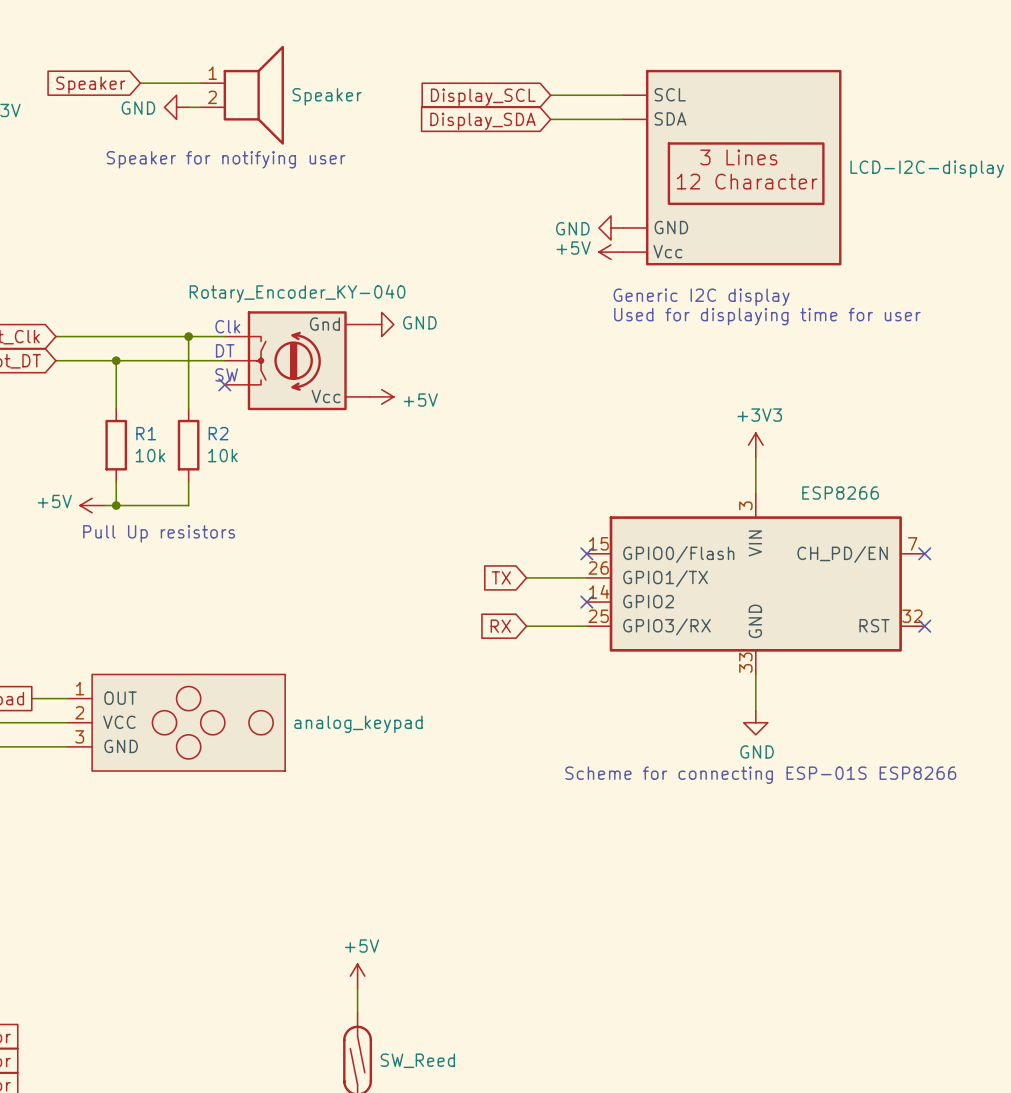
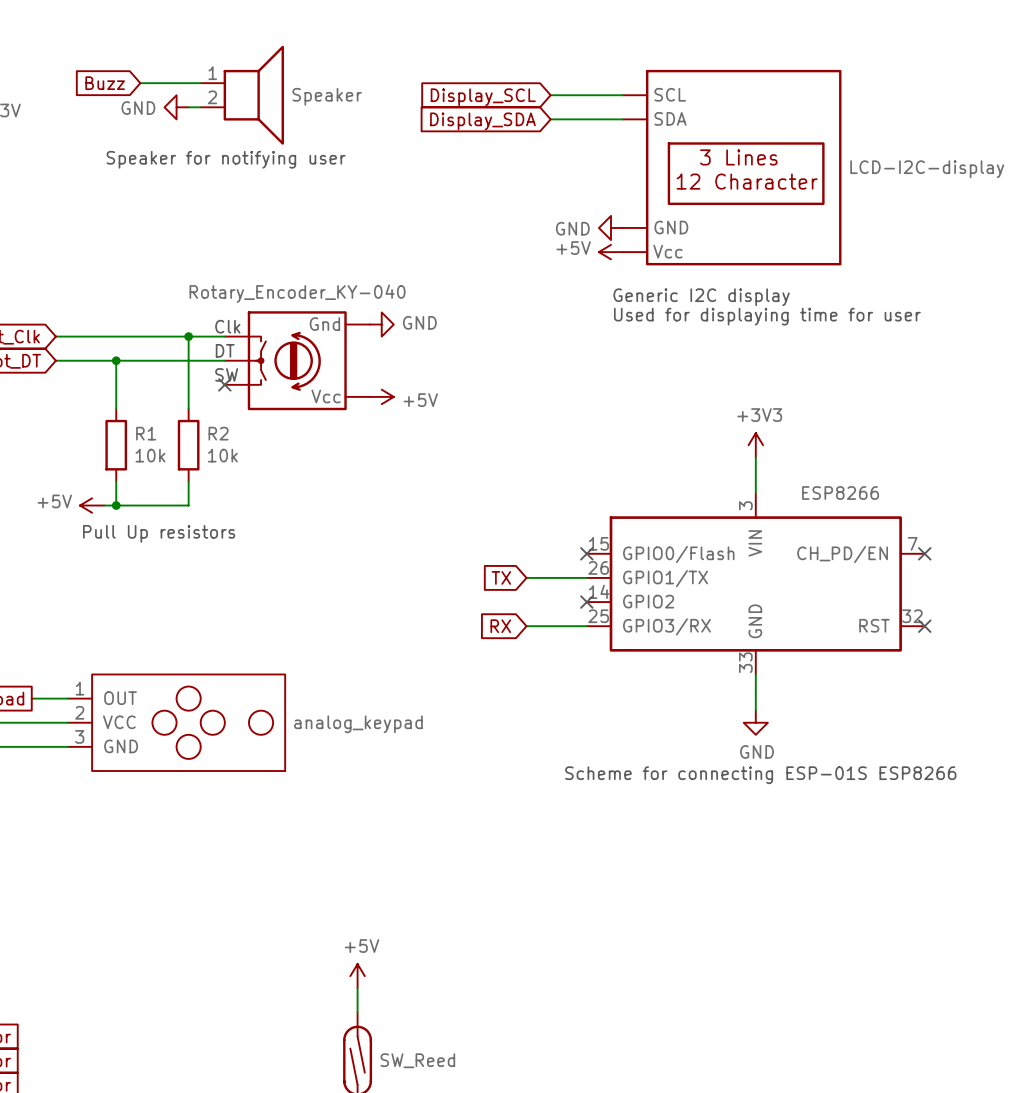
global label: Speaker (90, 85) -> Buzz (105, 83)

